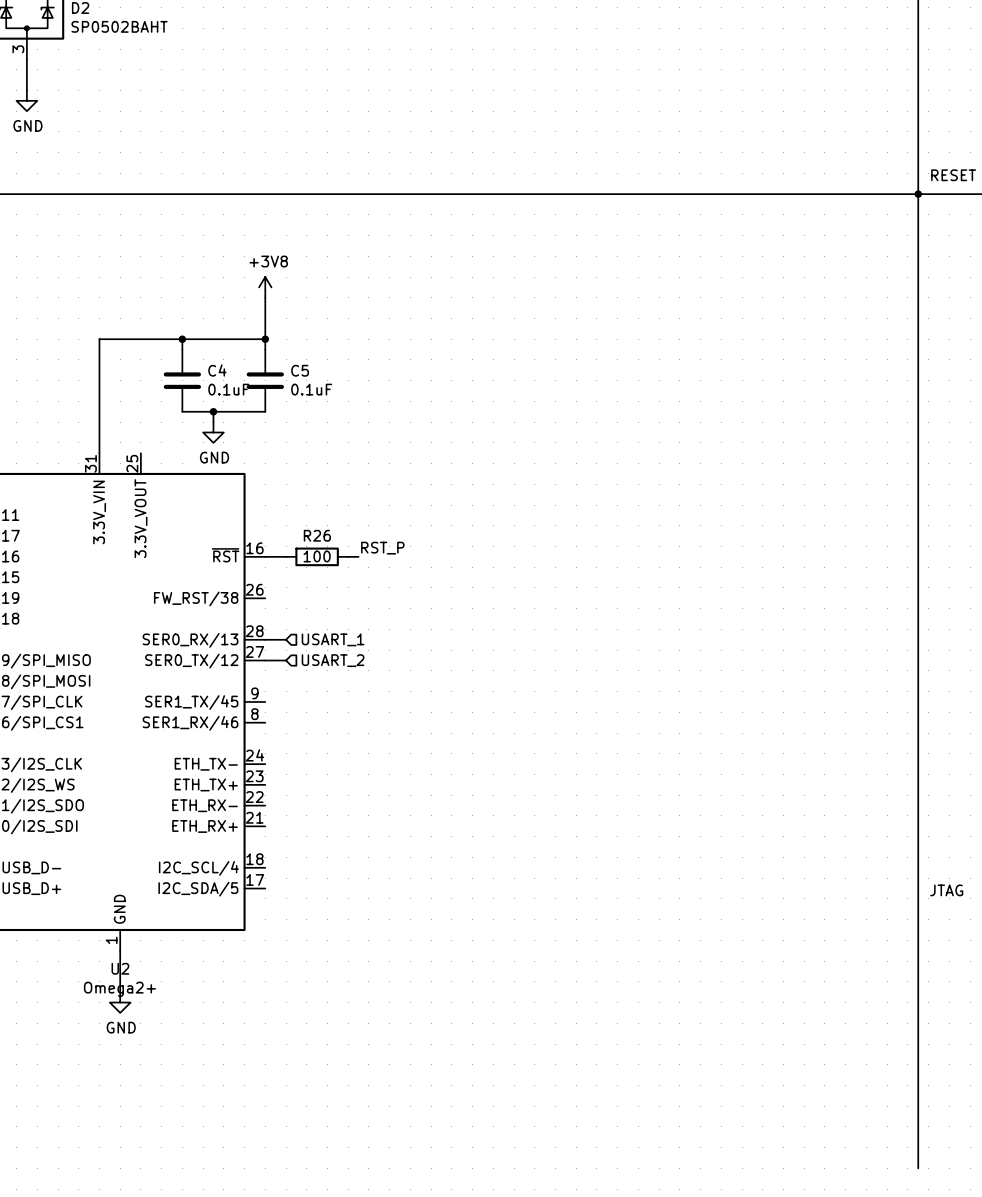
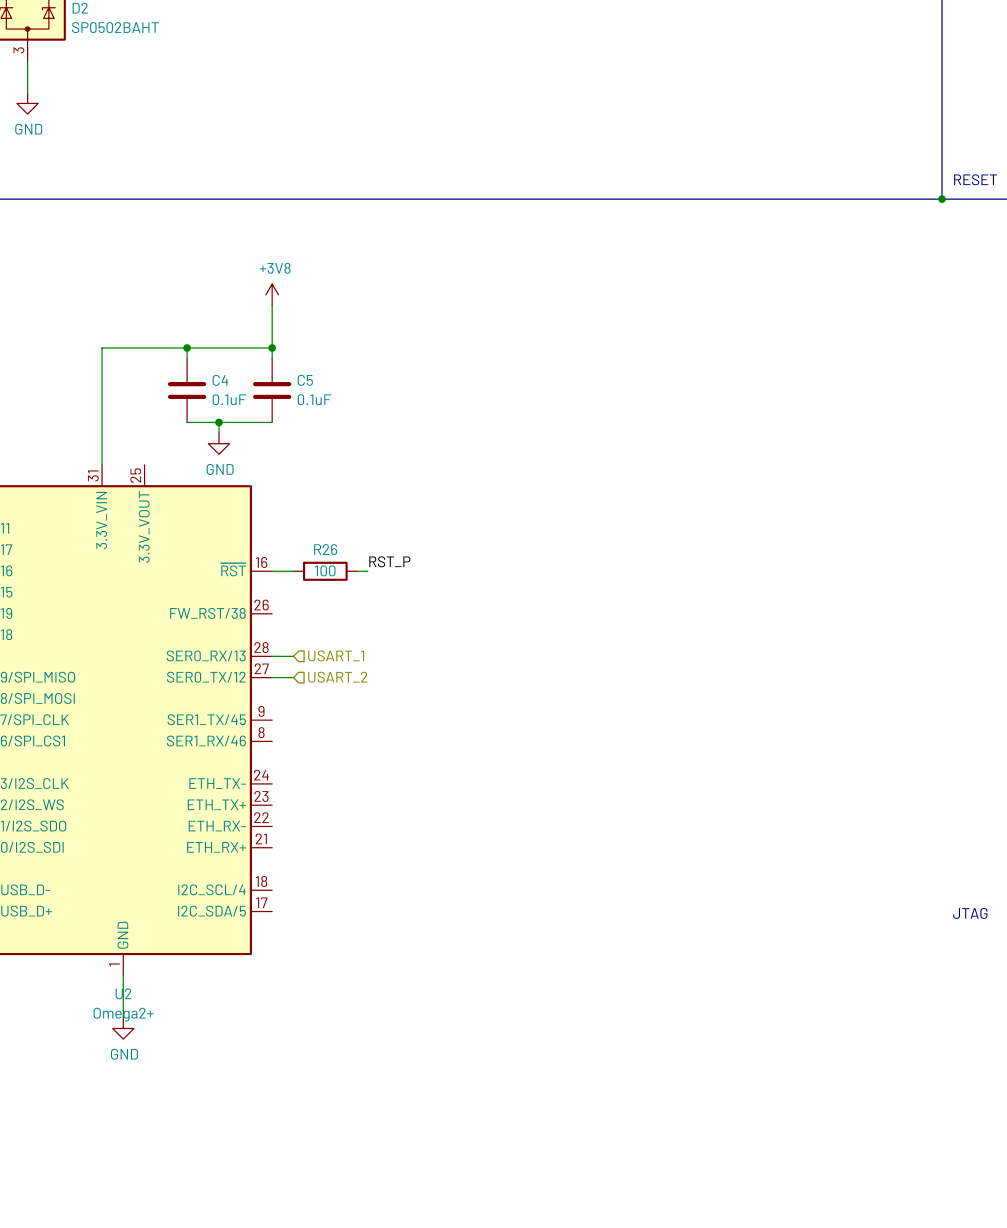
bus: (918, 194) (918, 1168) -> none

